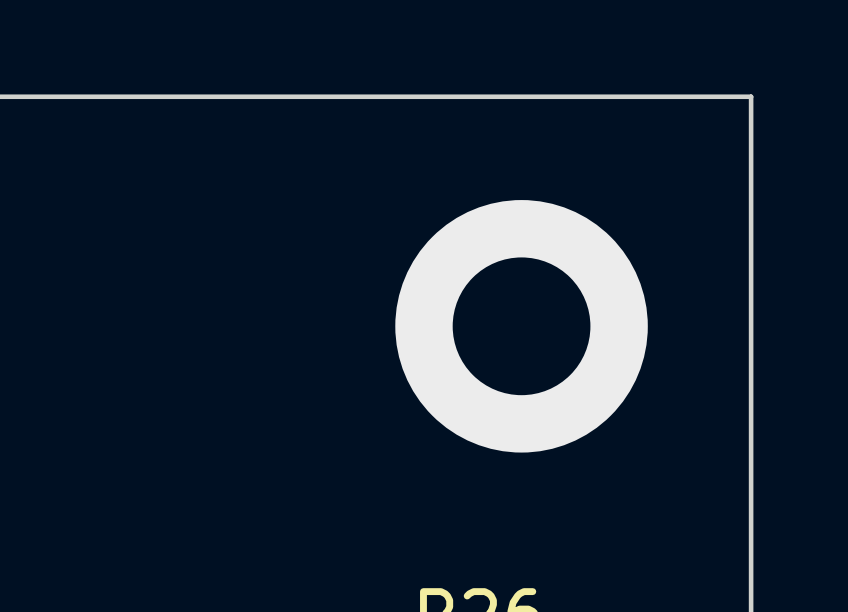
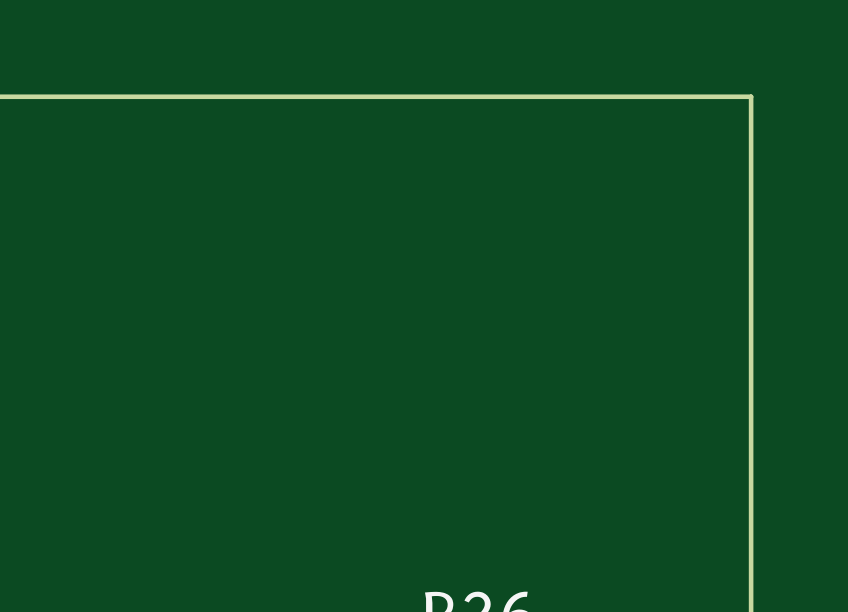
via: (521, 326) -> none

